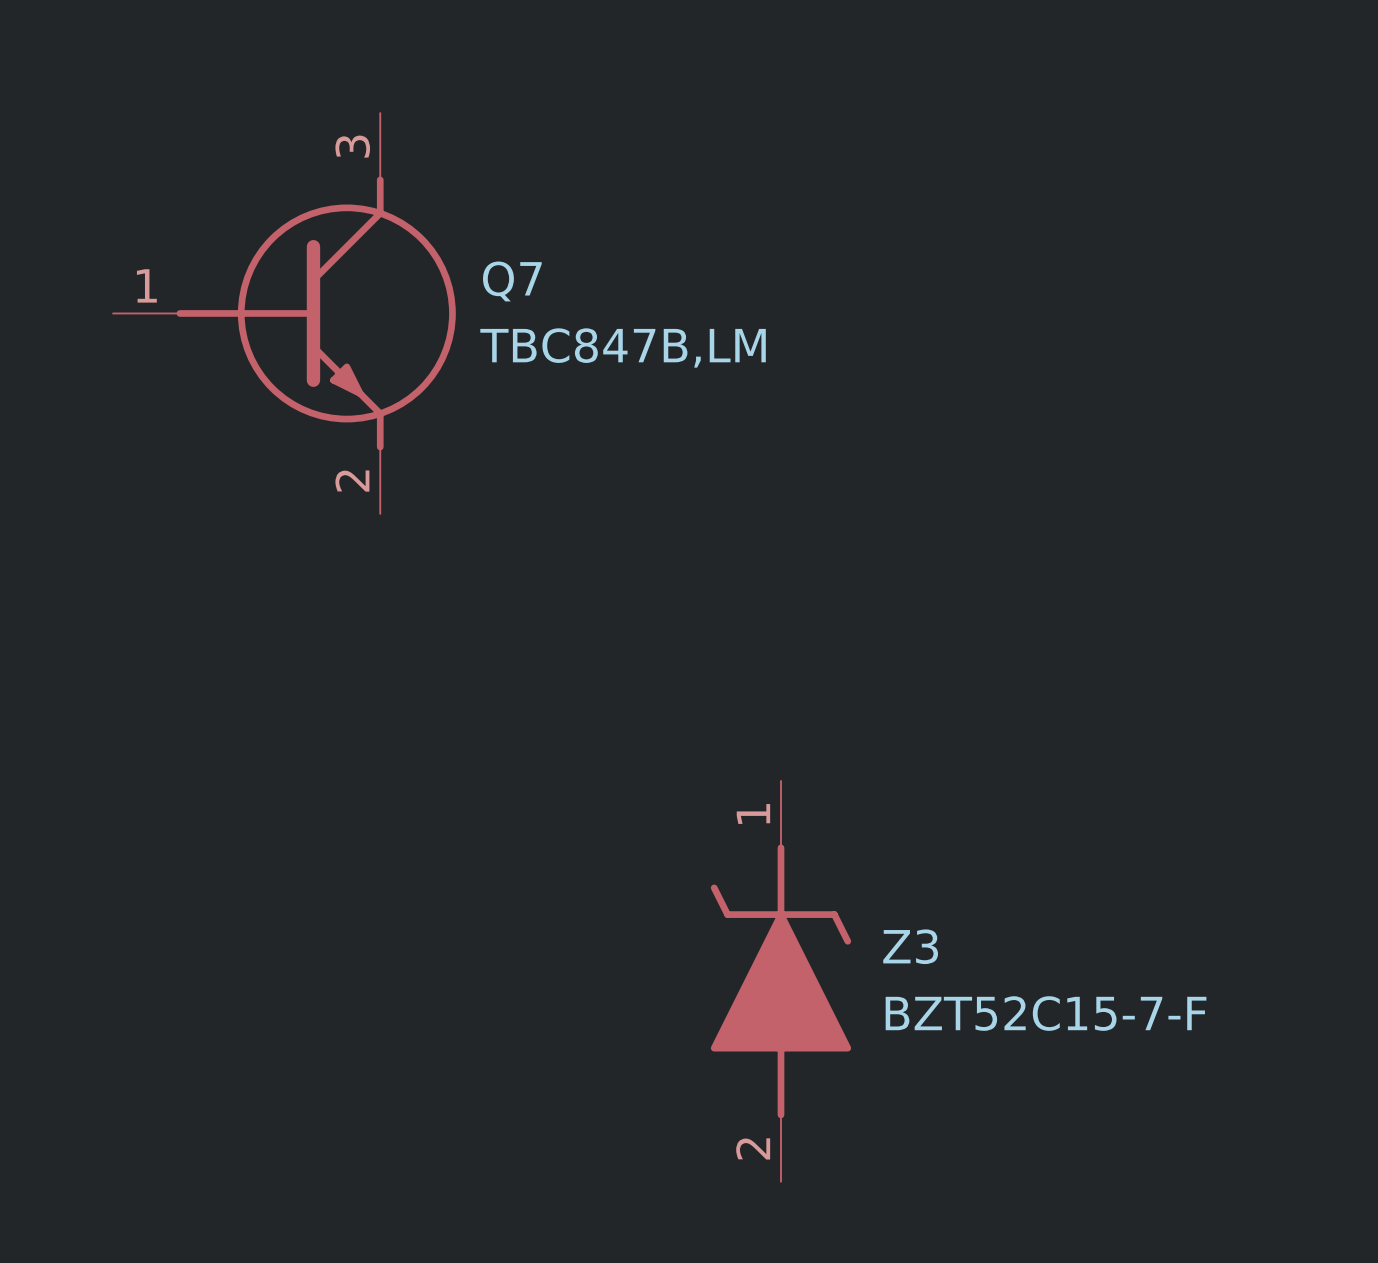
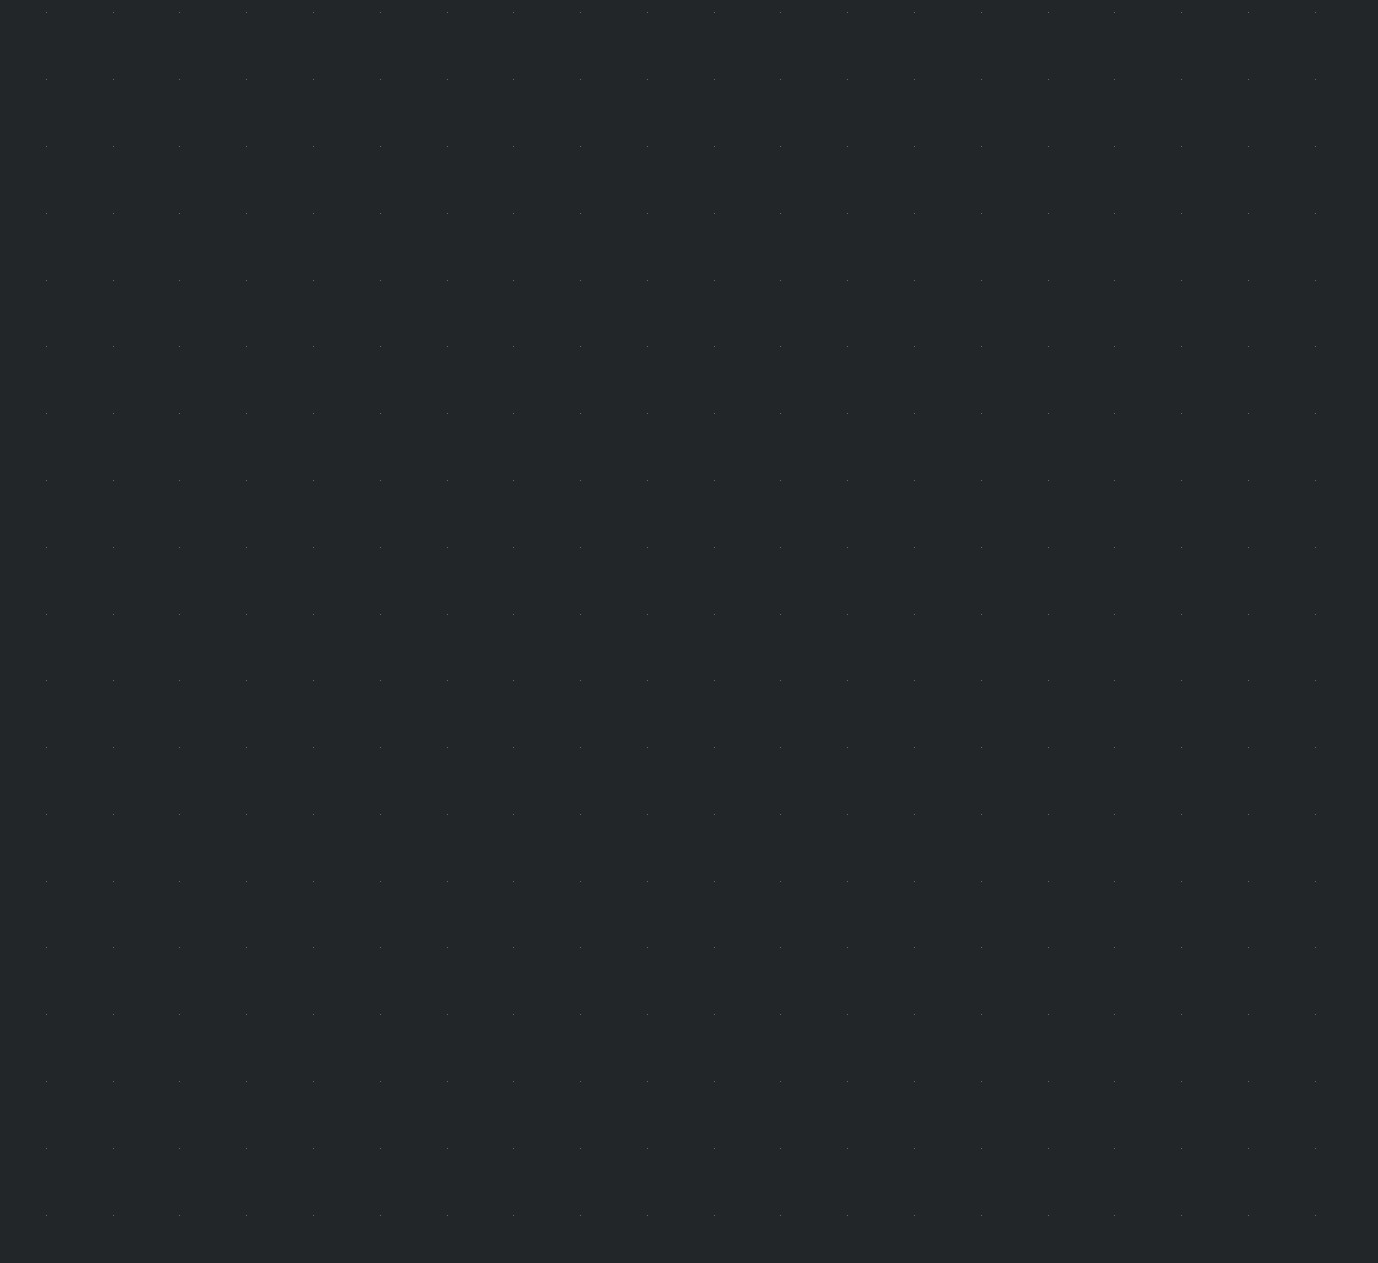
Q7: TBC847B,LM (284, 313) -> none
Z3: BZT52C15-7-F (780, 981) -> none

